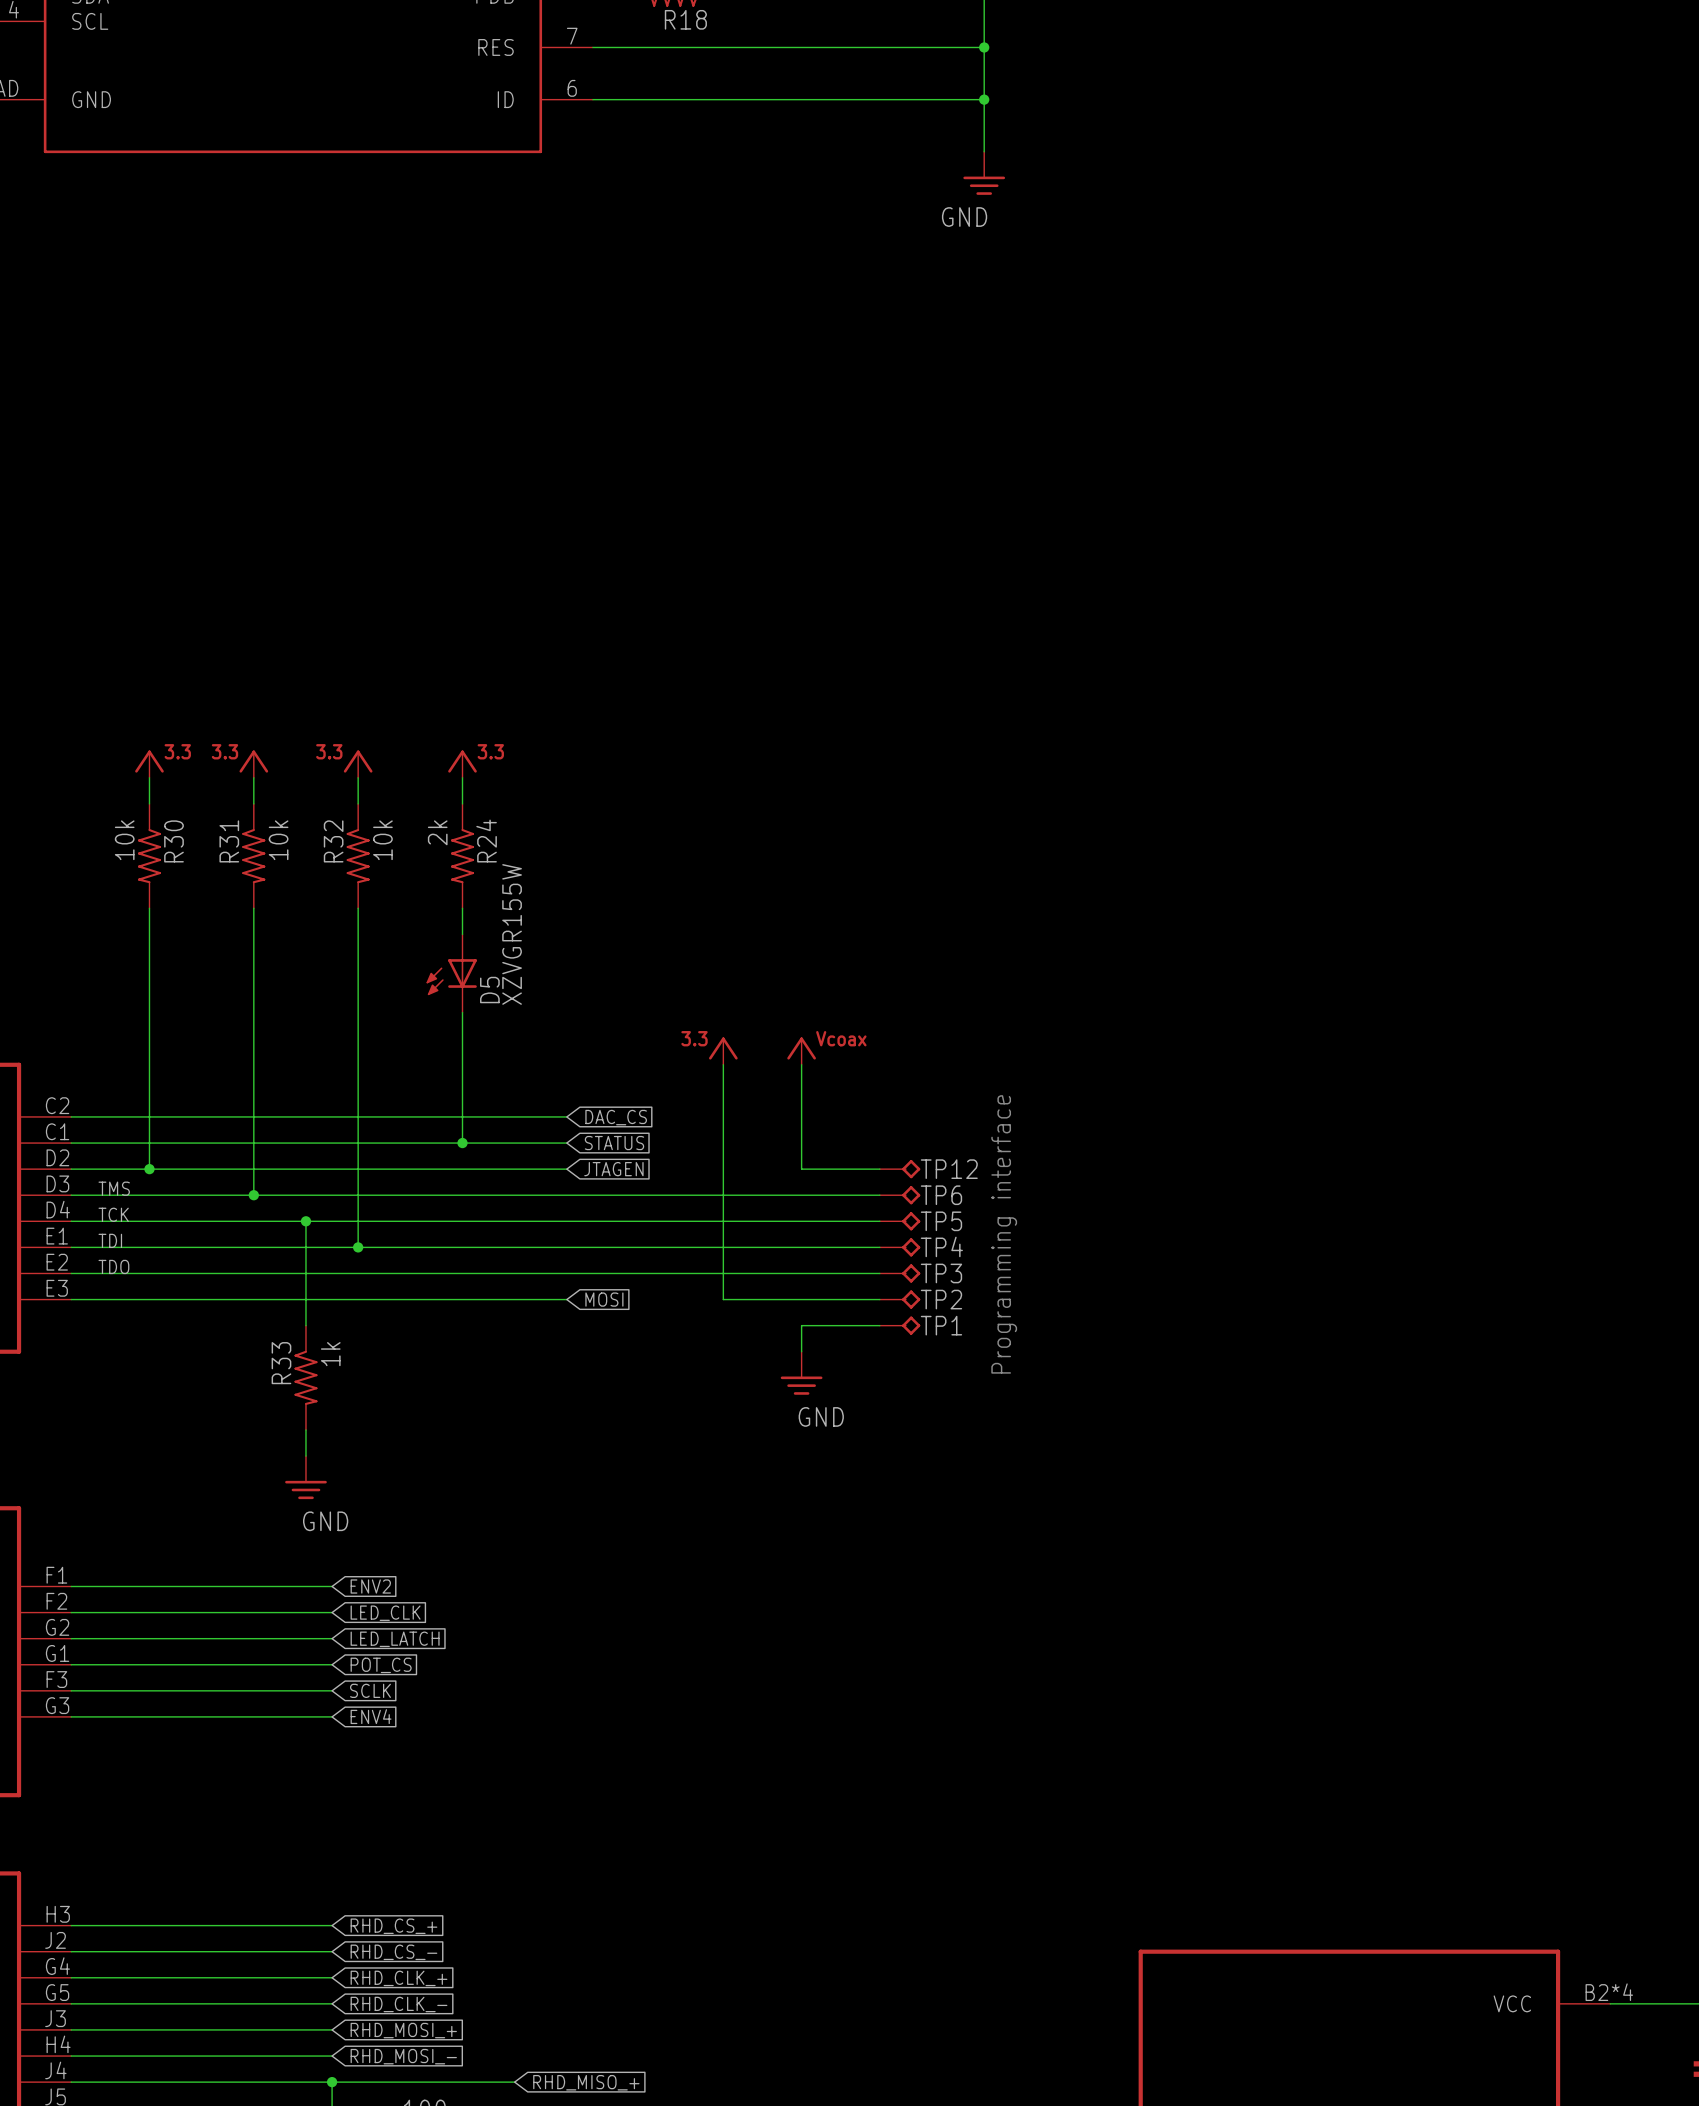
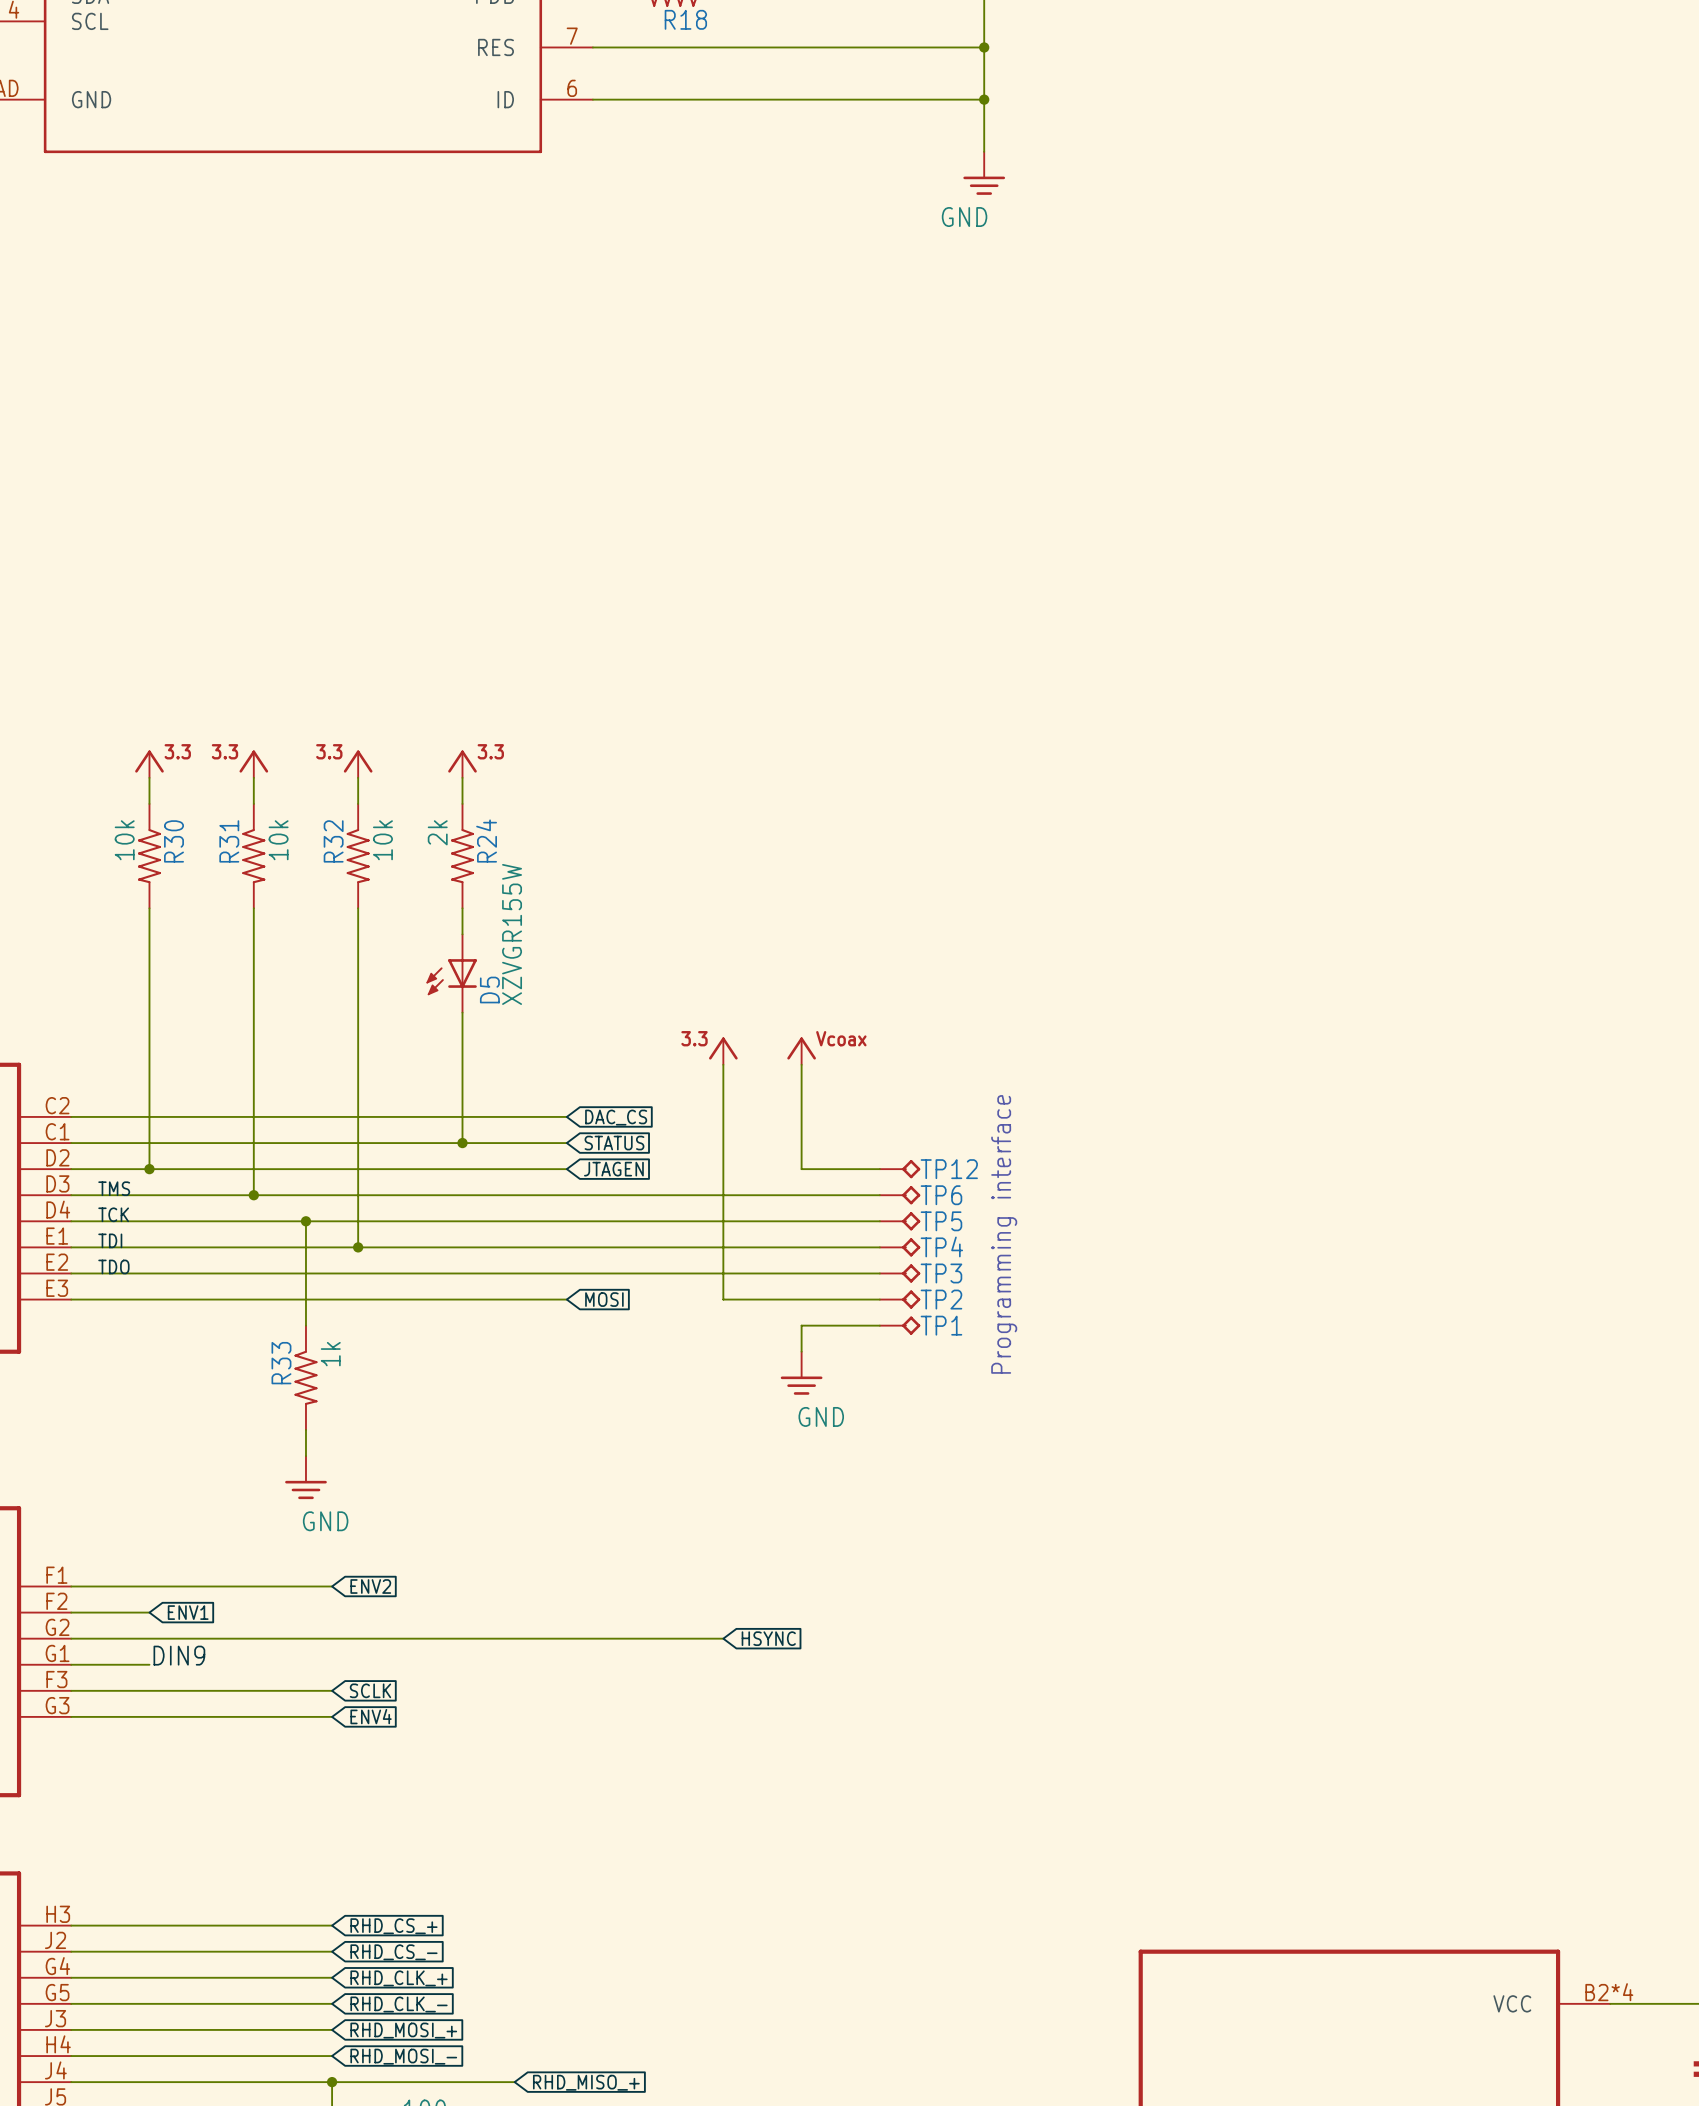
wire: (149, 1612) (332, 1612) -> none
global label: none -> ENV1 (188, 1612)
global label: LED_CLK (385, 1613) -> none
wire: none -> (332, 1638) (723, 1638)
global label: none -> HSYNC (768, 1638)
global label: LED_LATCH (395, 1639) -> none
label: none -> DIN9 (179, 1655)
wire: (149, 1664) (332, 1664) -> none
global label: POT_CS (381, 1665) -> none

